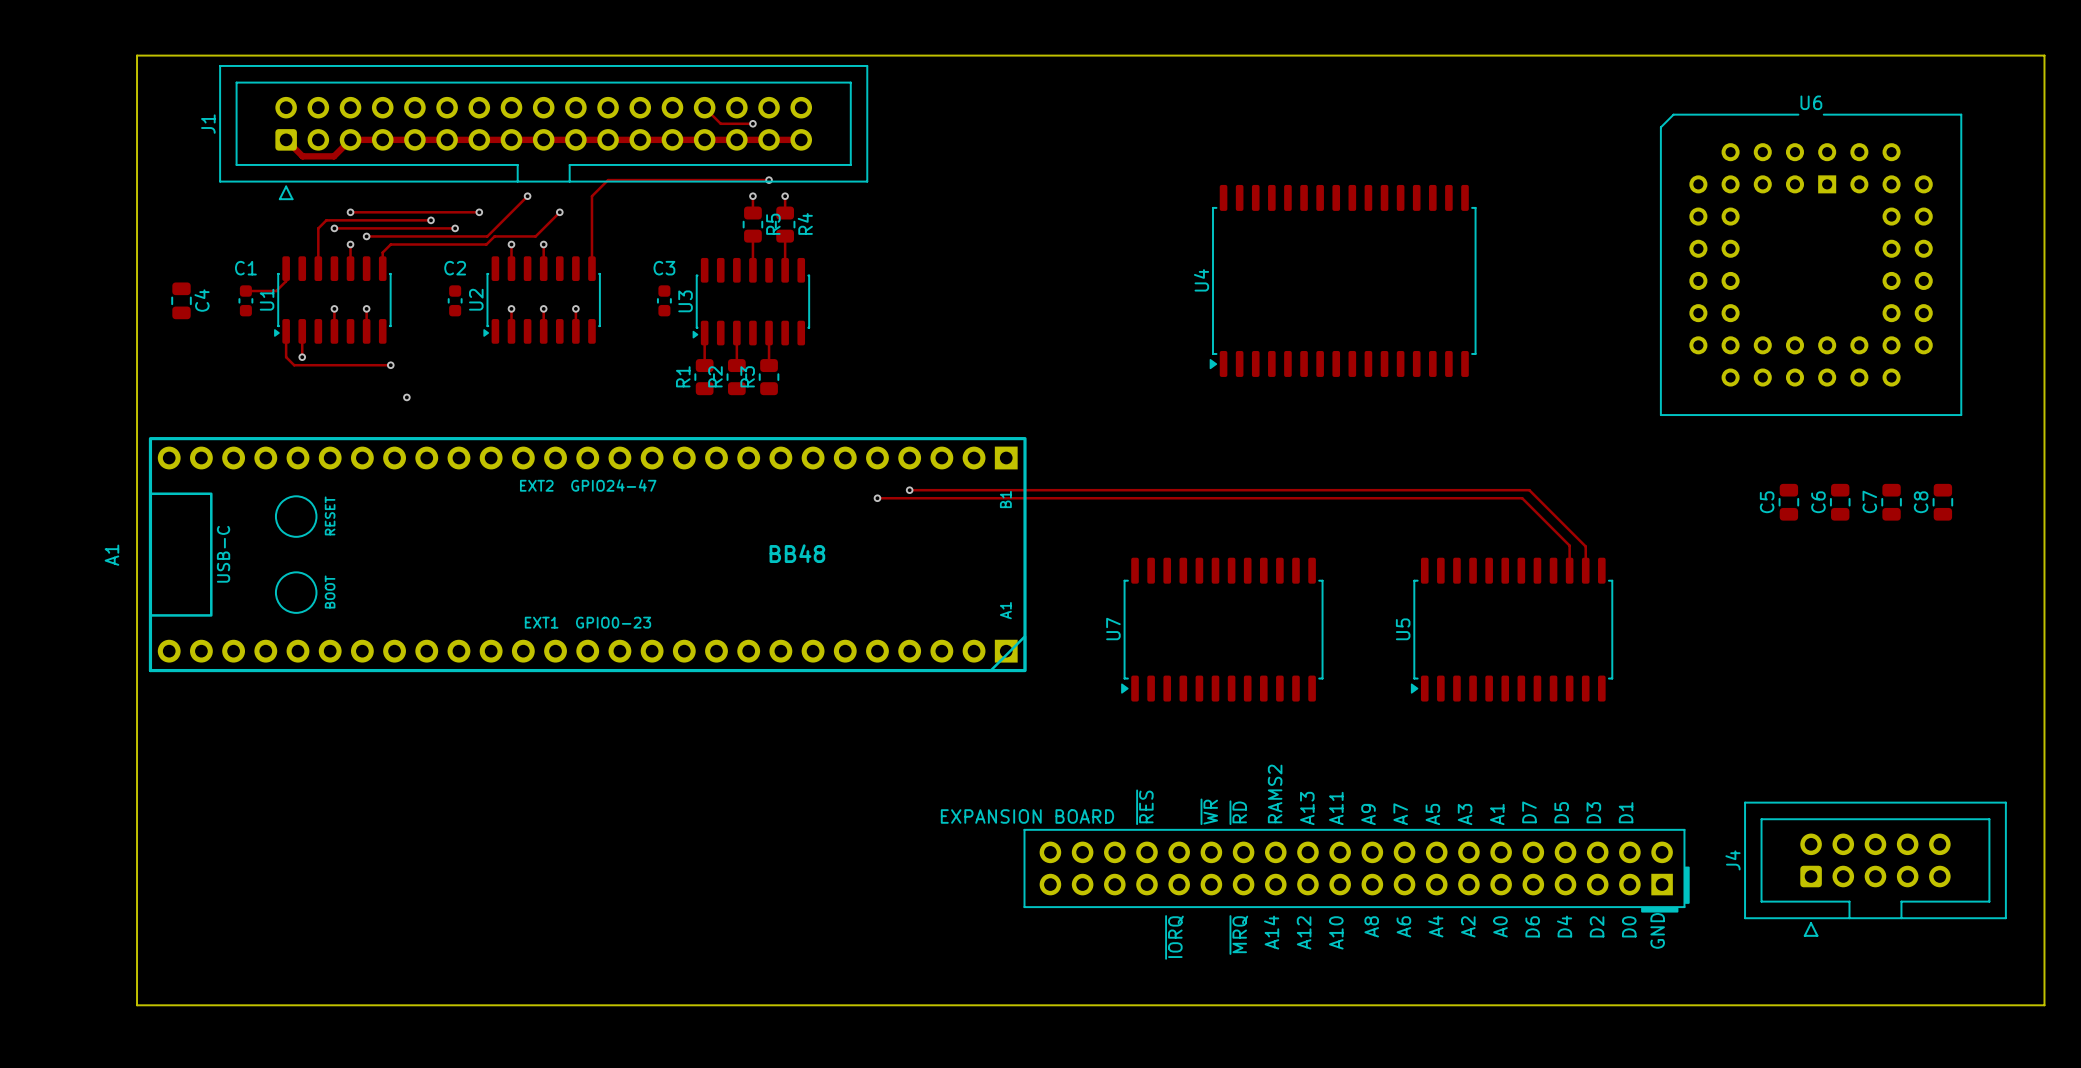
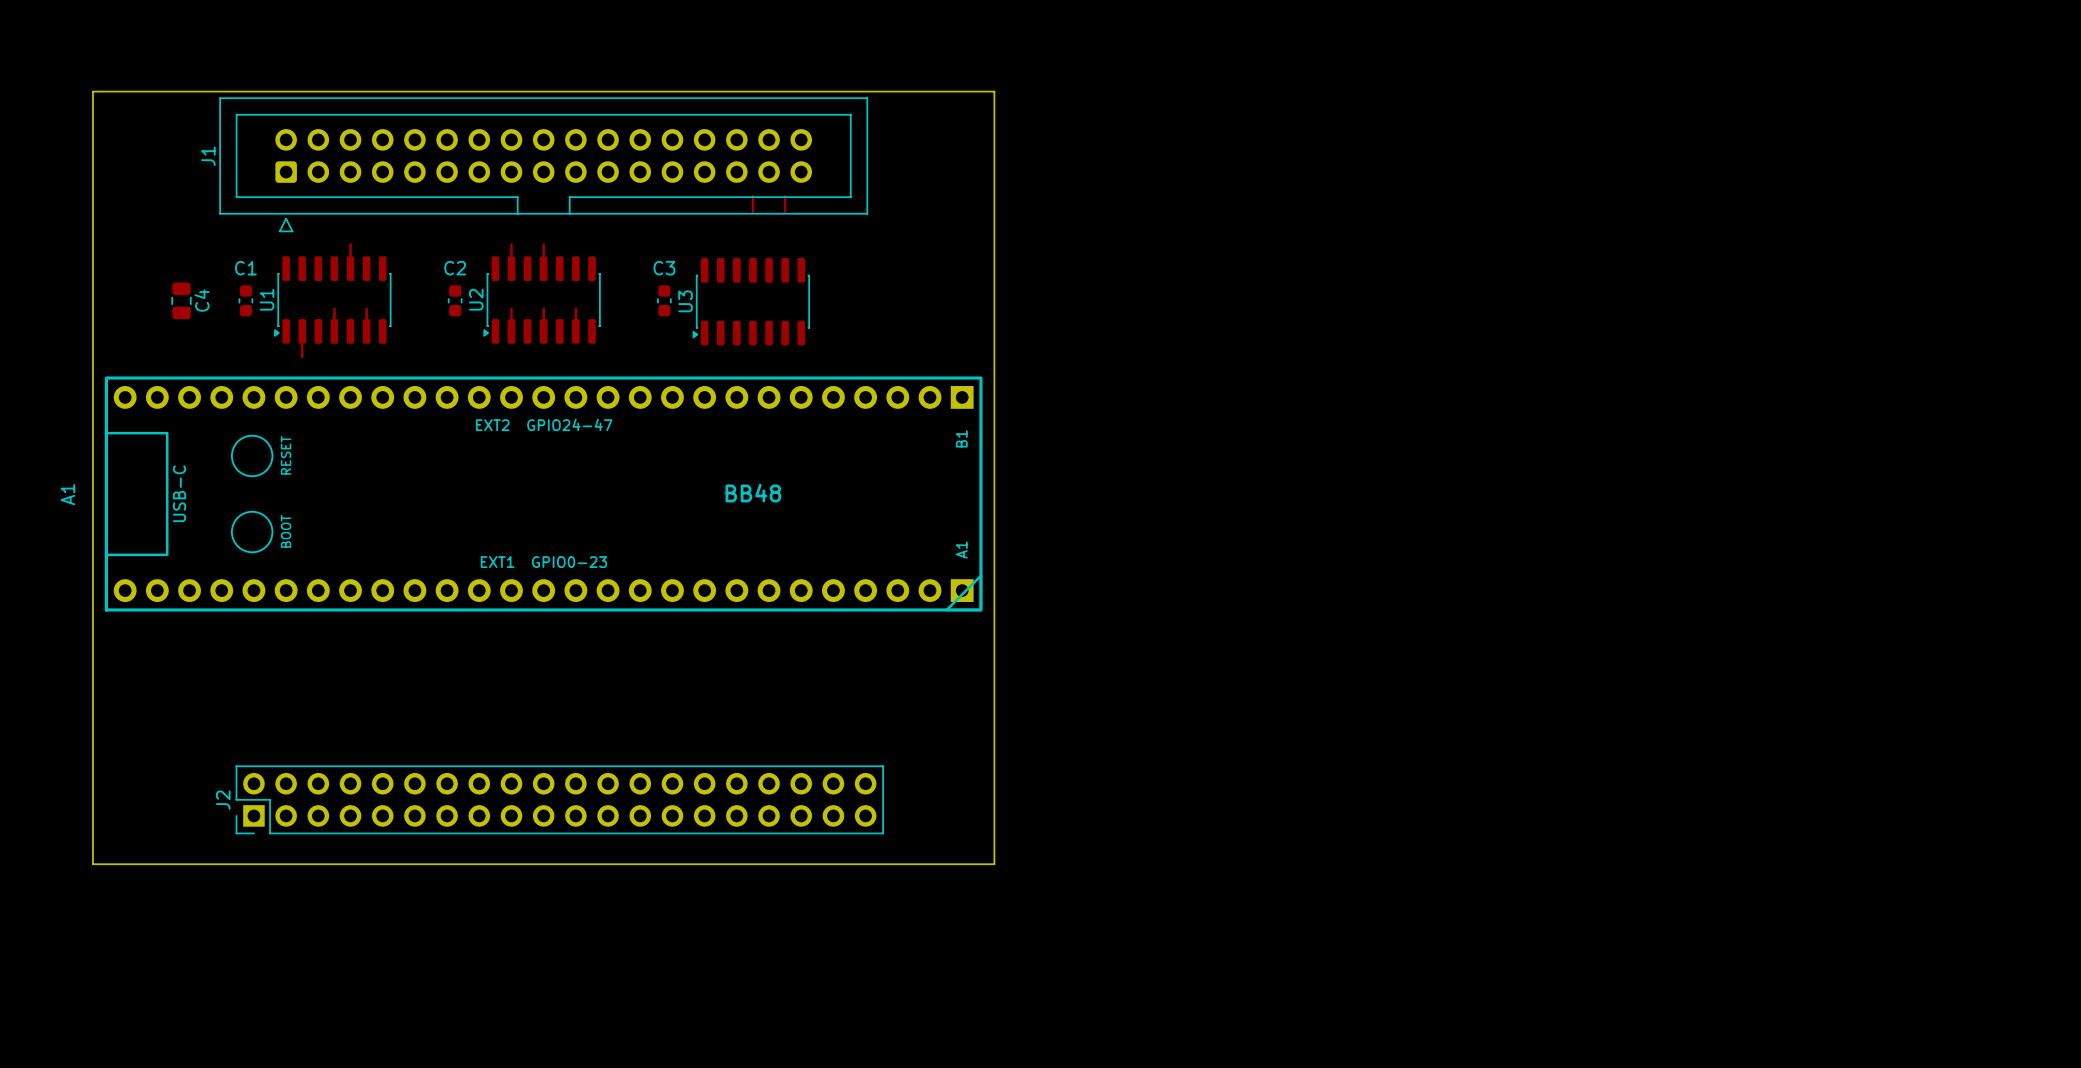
board edge: (137, 55) (2044, 55) (2044, 1005) (137, 1005) (137, 55) -> none
board edge: none -> (92, 91) (994, 91) (994, 864) (92, 864) (92, 91)
track: (704, 107) (720, 123) (752, 123) -> none
via: (752, 123) -> none
J1 position: (543, 132) -> (543, 164)
track: (286, 139) (302, 156) (334, 156) (350, 139) (801, 139) -> none
track: (769, 180) (608, 180) (591, 196) (591, 268) -> none
via: (769, 180) -> none
track: (527, 196) (487, 236) (366, 236) -> none
via: (527, 196) -> none
via: (752, 196) -> none
via: (785, 196) -> none
track: (350, 212) (479, 212) -> none
via: (350, 212) -> none
via: (479, 212) -> none
track: (559, 212) (535, 236) (494, 236) (486, 244) (390, 244) (382, 252) (382, 268) -> none
via: (559, 212) -> none
track: (431, 220) (326, 220) (318, 228) (318, 268) -> none
via: (431, 220) -> none
R5: (752, 224) -> none
R4: (785, 224) -> none
track: (334, 228) (455, 228) -> none
via: (334, 228) -> none
via: (455, 228) -> none
via: (366, 236) -> none
track: (752, 236) (752, 270) -> none
track: (785, 236) (785, 270) -> none
via: (350, 244) -> none
via: (511, 244) -> none
via: (543, 244) -> none
U6: (1811, 264) -> none
track: (286, 268) (286, 281) (276, 291) (245, 291) -> none
U4: (1342, 280) -> none
via: (334, 308) -> none
via: (366, 308) -> none
via: (511, 308) -> none
via: (543, 308) -> none
via: (575, 308) -> none
track: (286, 331) (286, 357) (294, 365) (390, 365) -> none
track: (704, 333) (704, 365) -> none
track: (736, 333) (736, 365) -> none
track: (769, 333) (769, 365) -> none
via: (302, 357) -> none
via: (390, 365) -> none
R1: (704, 377) -> none
R2: (736, 377) -> none
R3: (769, 377) -> none
via: (406, 397) -> none
track: (909, 490) (1529, 490) (1585, 546) (1585, 570) -> none
via: (909, 490) -> none
track: (877, 498) (1522, 498) (1569, 545) (1569, 570) -> none
via: (877, 498) -> none
C5: (1788, 502) -> none
C6: (1840, 502) -> none
C7: (1891, 502) -> none
C8: (1942, 502) -> none
A1 position: (587, 554) -> (543, 494)
U7: (1222, 629) -> none
U5: (1511, 629) -> none
text: RAMS2 (1275, 793) -> none
J2: none -> (559, 799)
text: ~{RES} (1144, 807) -> none
text: A13 (1307, 808) -> none
text: A11 (1336, 808) -> none
text: ~{WR} (1209, 811) -> none
text: ~{RD} (1238, 812) -> none
text: D7 (1529, 812) -> none
text: D5 (1561, 812) -> none
text: D3 (1593, 812) -> none
text: D1 (1626, 812) -> none
text: A9 (1368, 814) -> none
text: A7 (1400, 814) -> none
text: A5 (1432, 814) -> none
text: A3 (1465, 814) -> none
text: A1 (1497, 814) -> none
text: EXPANSION BOARD (1027, 816) -> none
line: (1024, 829) (1684, 829) (1684, 907) (1024, 907) (1024, 829) -> none
drawing: [1641, 866, 1690, 913] -> none
part: (1356, 868) -> none
J4: (1875, 869) -> none
text: A8 (1371, 926) -> none
text: A6 (1403, 926) -> none
text: A4 (1435, 926) -> none
text: A2 (1468, 926) -> none
text: A0 (1500, 926) -> none
text: D6 (1532, 926) -> none
text: D4 (1564, 926) -> none
text: D2 (1597, 926) -> none
text: D0 (1629, 926) -> none
text: GND (1657, 930) -> none
text: A14 (1271, 932) -> none
text: A12 (1304, 932) -> none
text: A10 (1336, 932) -> none
text: ~{MRQ} (1238, 935) -> none
text: ~{IORQ} (1174, 937) -> none

